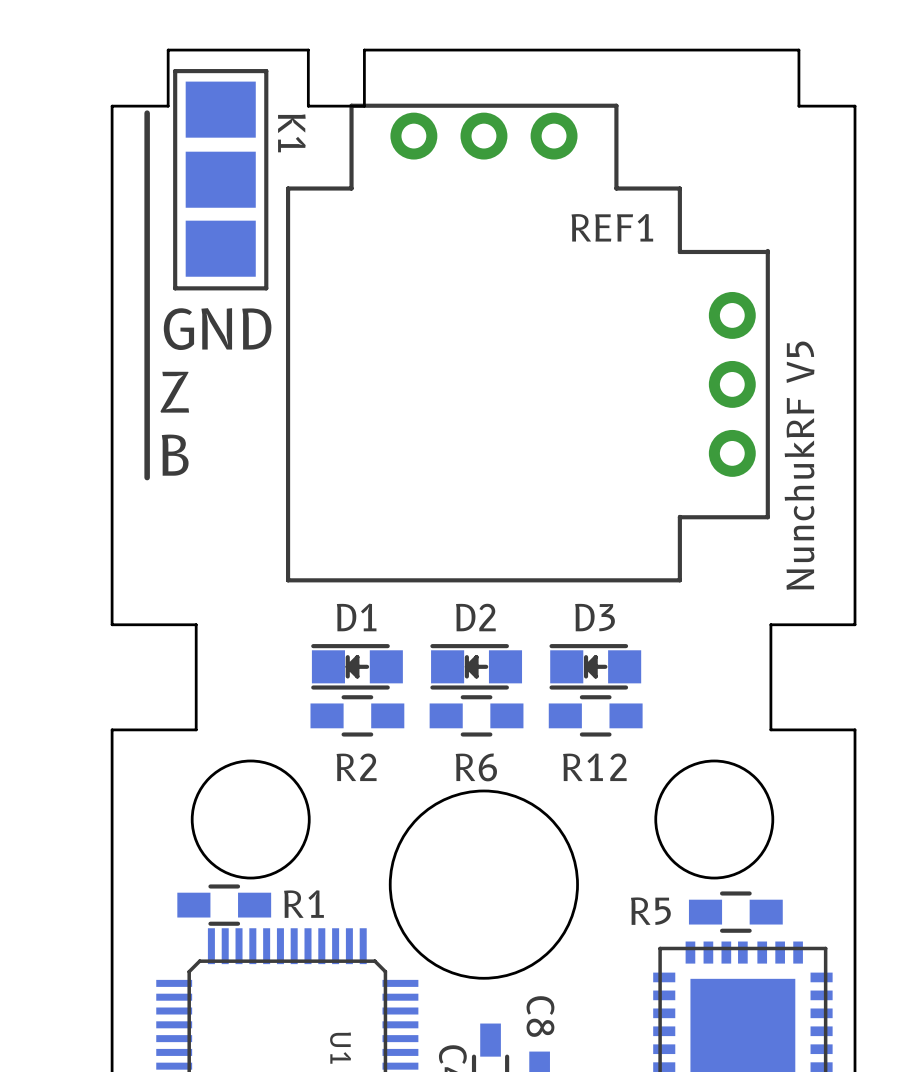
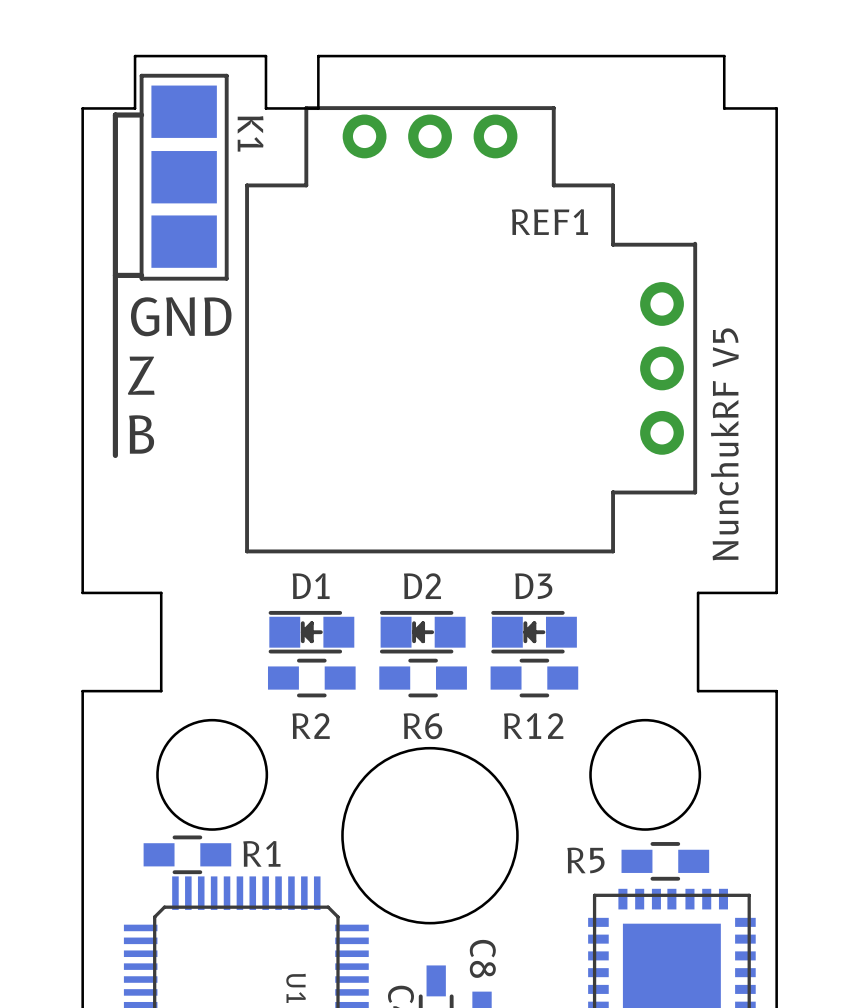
line: none -> (141, 115) (115, 115)
line: none -> (141, 275) (115, 275)

